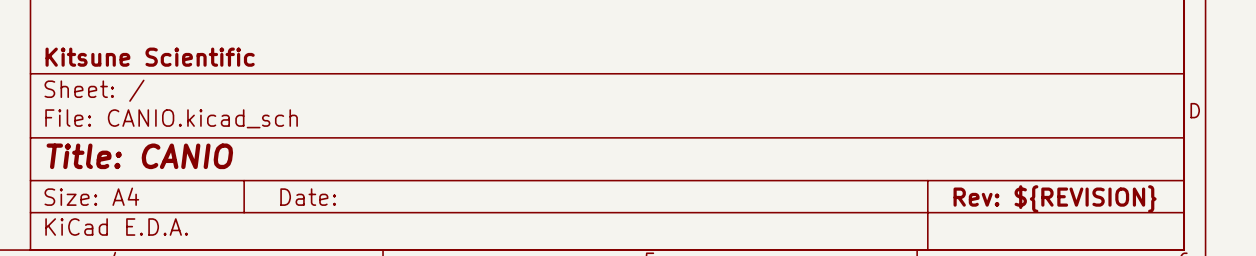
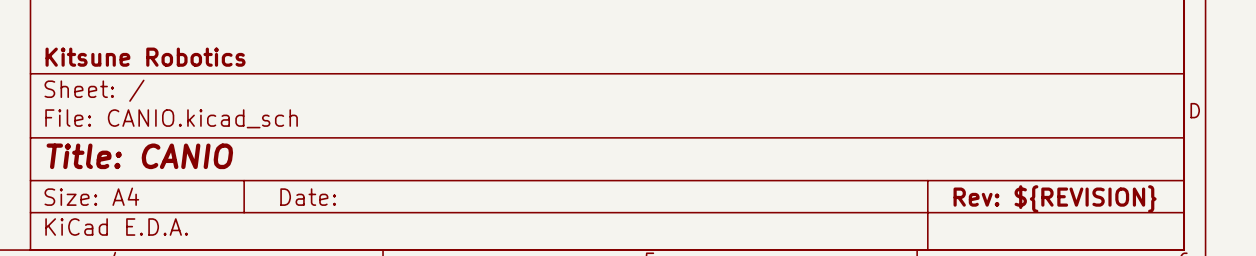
title block: Kitsune Scientific (150, 57) -> Kitsune Robotics (145, 57)

